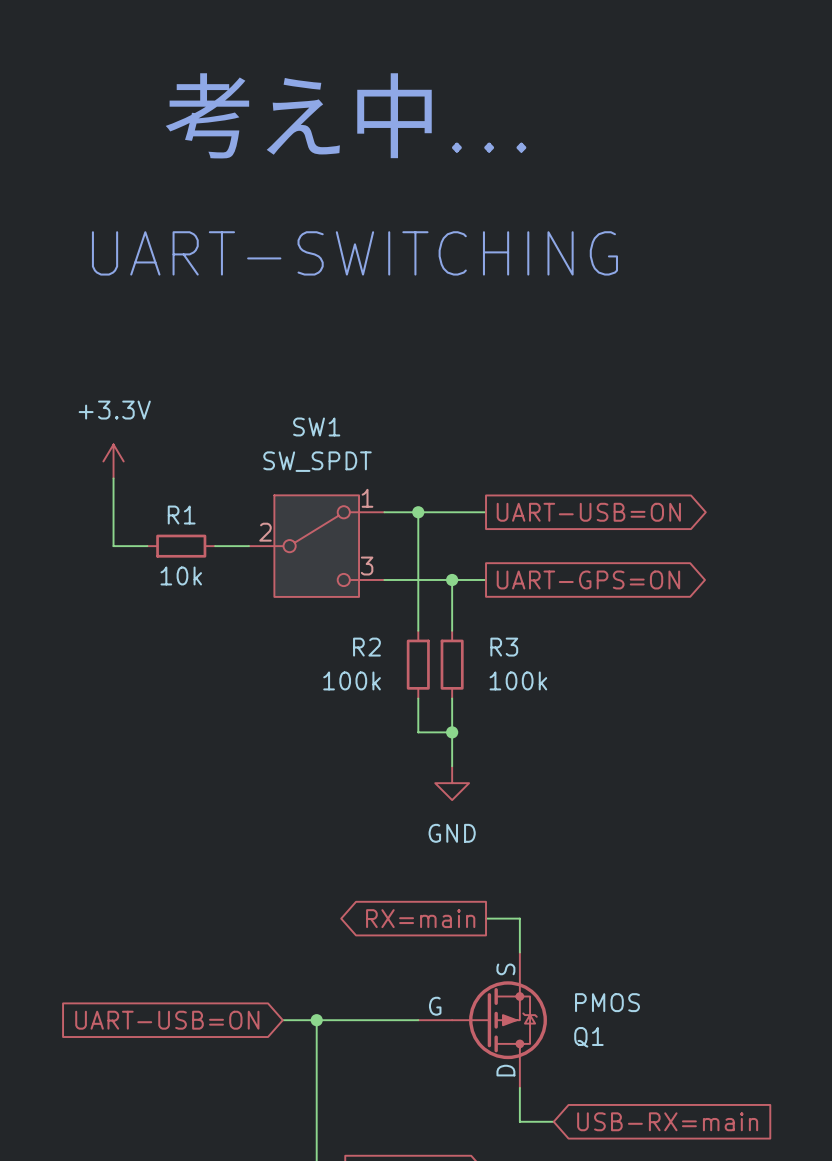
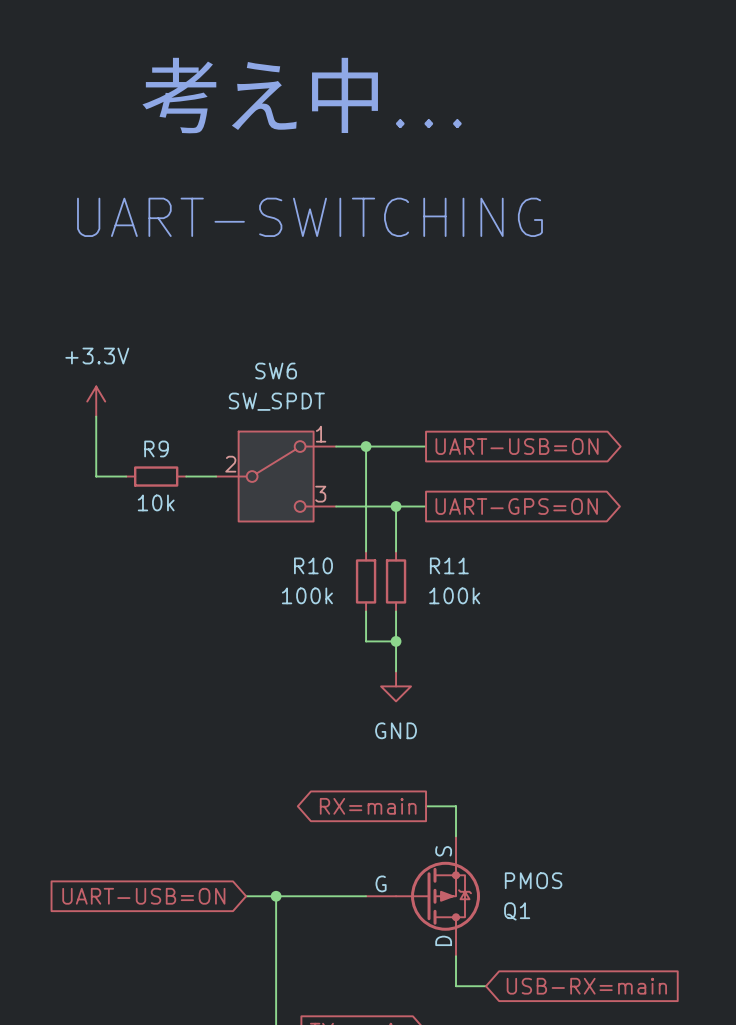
SW1 name: SW1 (316, 426) -> SW6 (276, 371)
R1 name: R1 (181, 515) -> R9 (156, 448)
R2 name: R2 (366, 647) -> R10 (313, 565)
R3 name: R3 (504, 647) -> R11 (449, 565)

